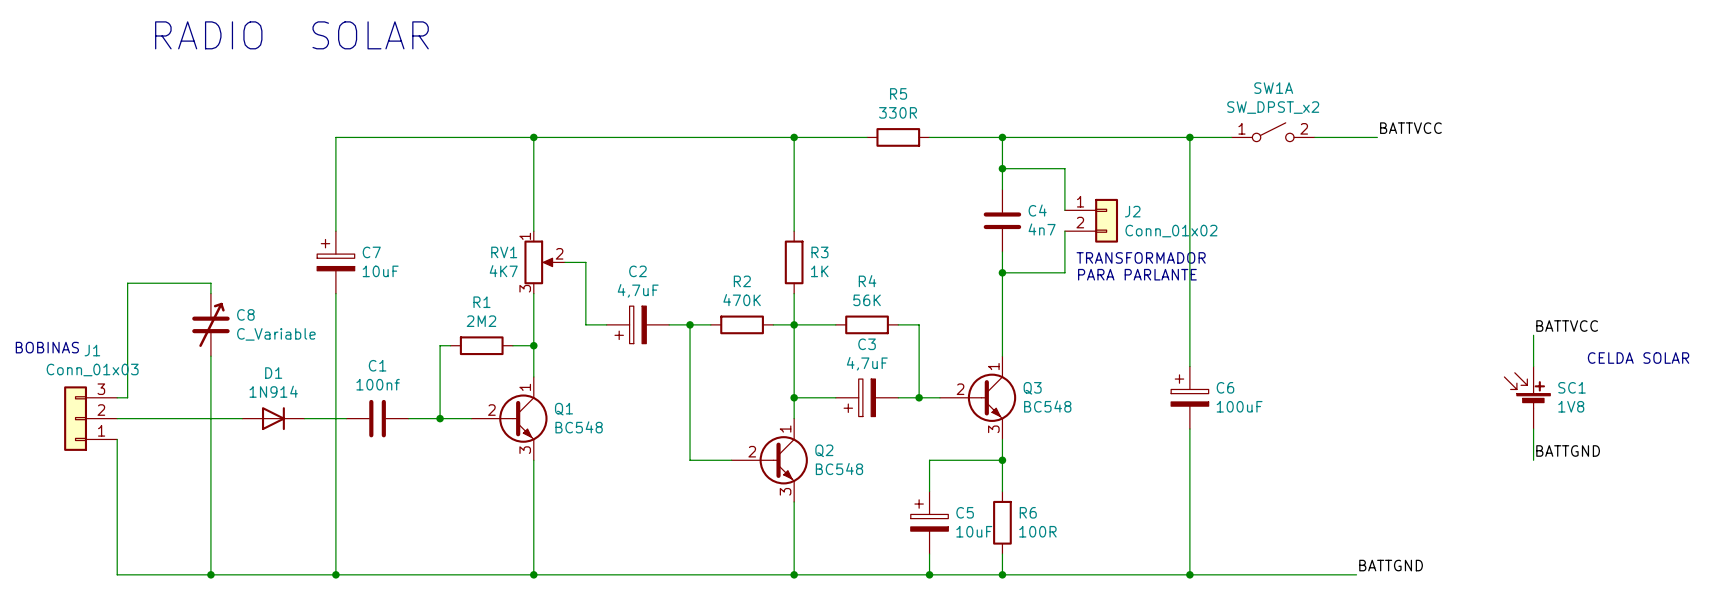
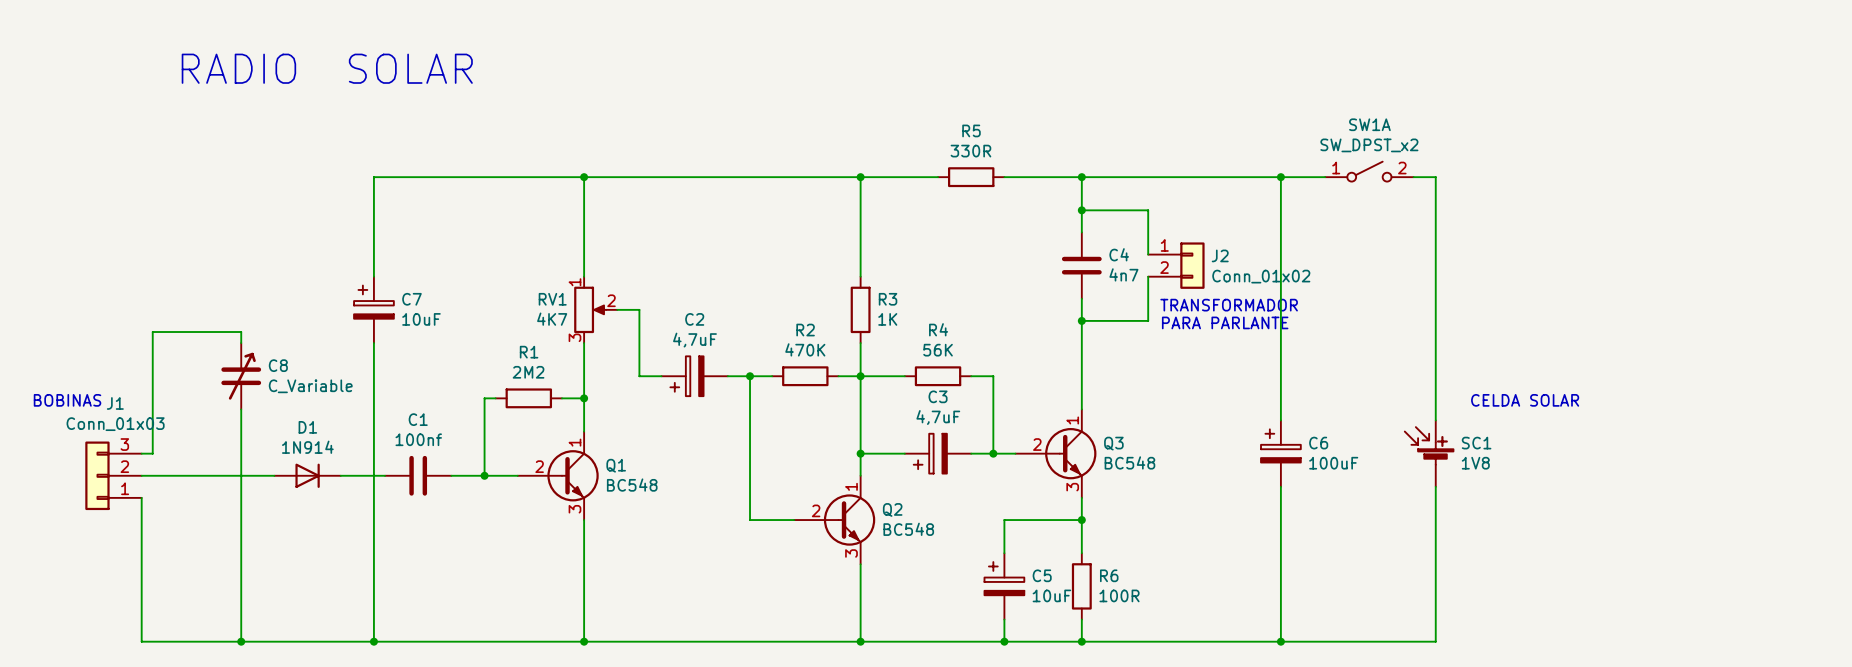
label: BATTVCC (1410, 128) -> none
wire: (1335, 137) (1377, 137) -> (1435, 177) (1435, 420)
label: BATTVCC (1567, 326) -> none
wire: (1533, 335) (1533, 366) -> none
text: none -> CELDA SOLAR (1525, 400)
text: CELDA SOLAR (1638, 358) -> none
SC1 position: (1527, 397) -> (1429, 453)
wire: (1533, 429) (1533, 460) -> none
label: BATTGND (1568, 450) -> none
label: BATTGND (1391, 565) -> none
wire: (1335, 574) (1356, 574) -> (1435, 641) (1435, 486)

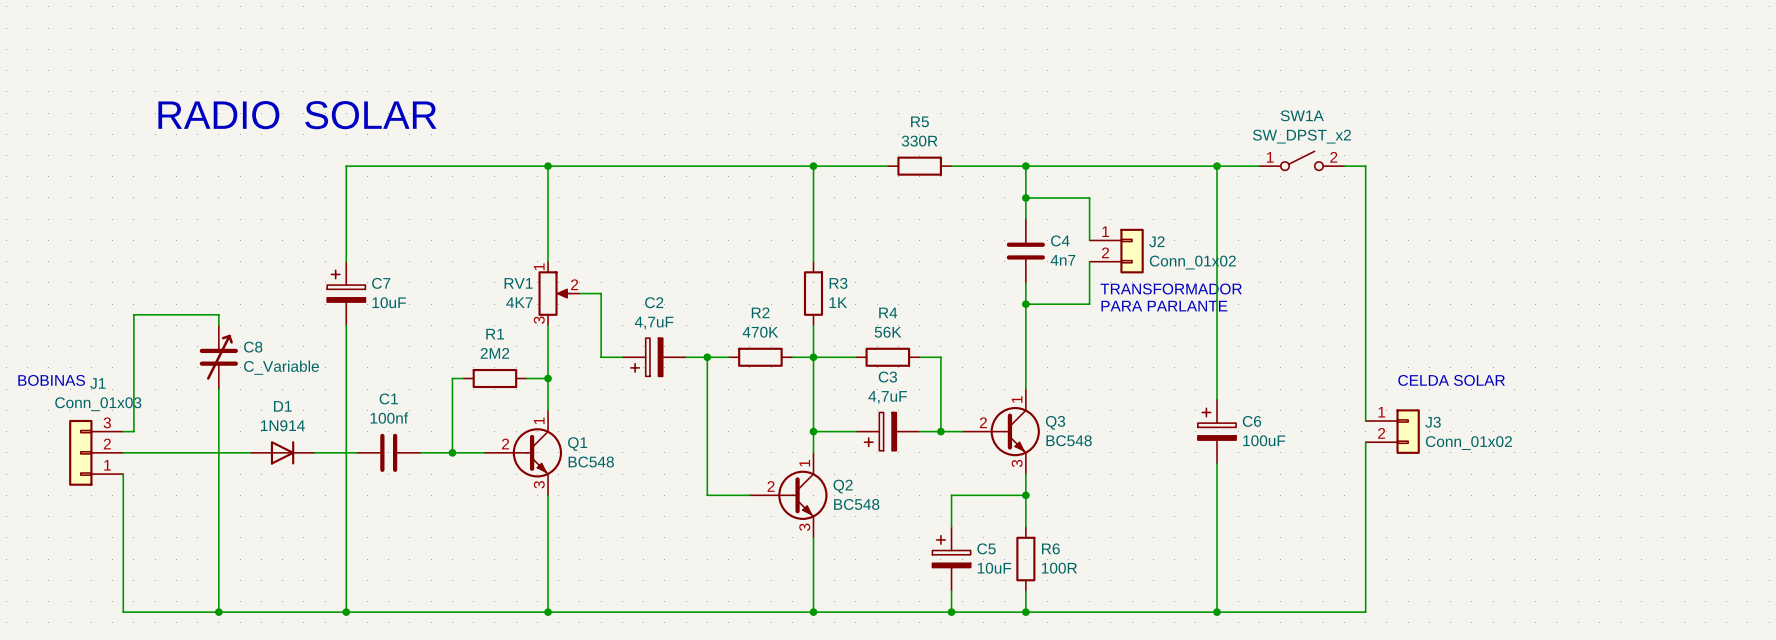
text position: RADIO SOLAR (327, 68) -> RADIO SOLAR (297, 115)
SC1: 1V8 (1429, 453) -> none
J3: none -> Conn_01x02 (1392, 431)

